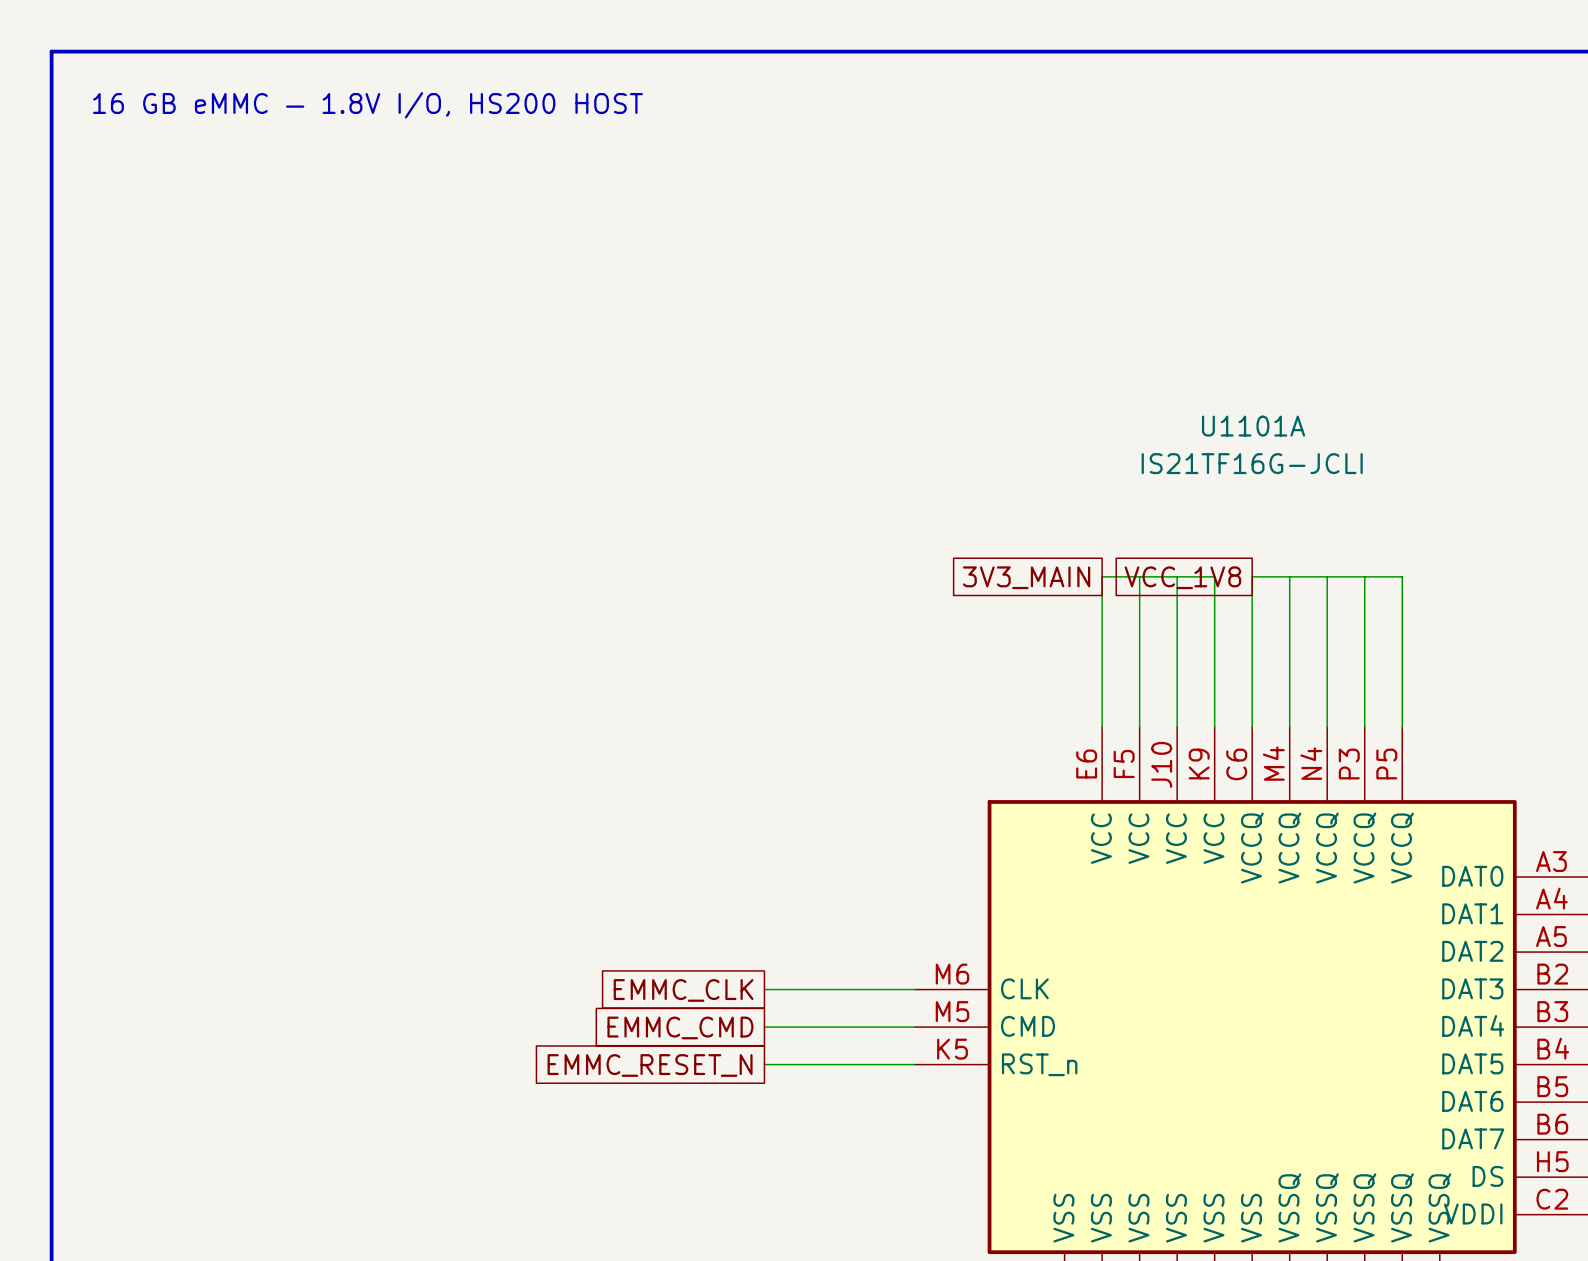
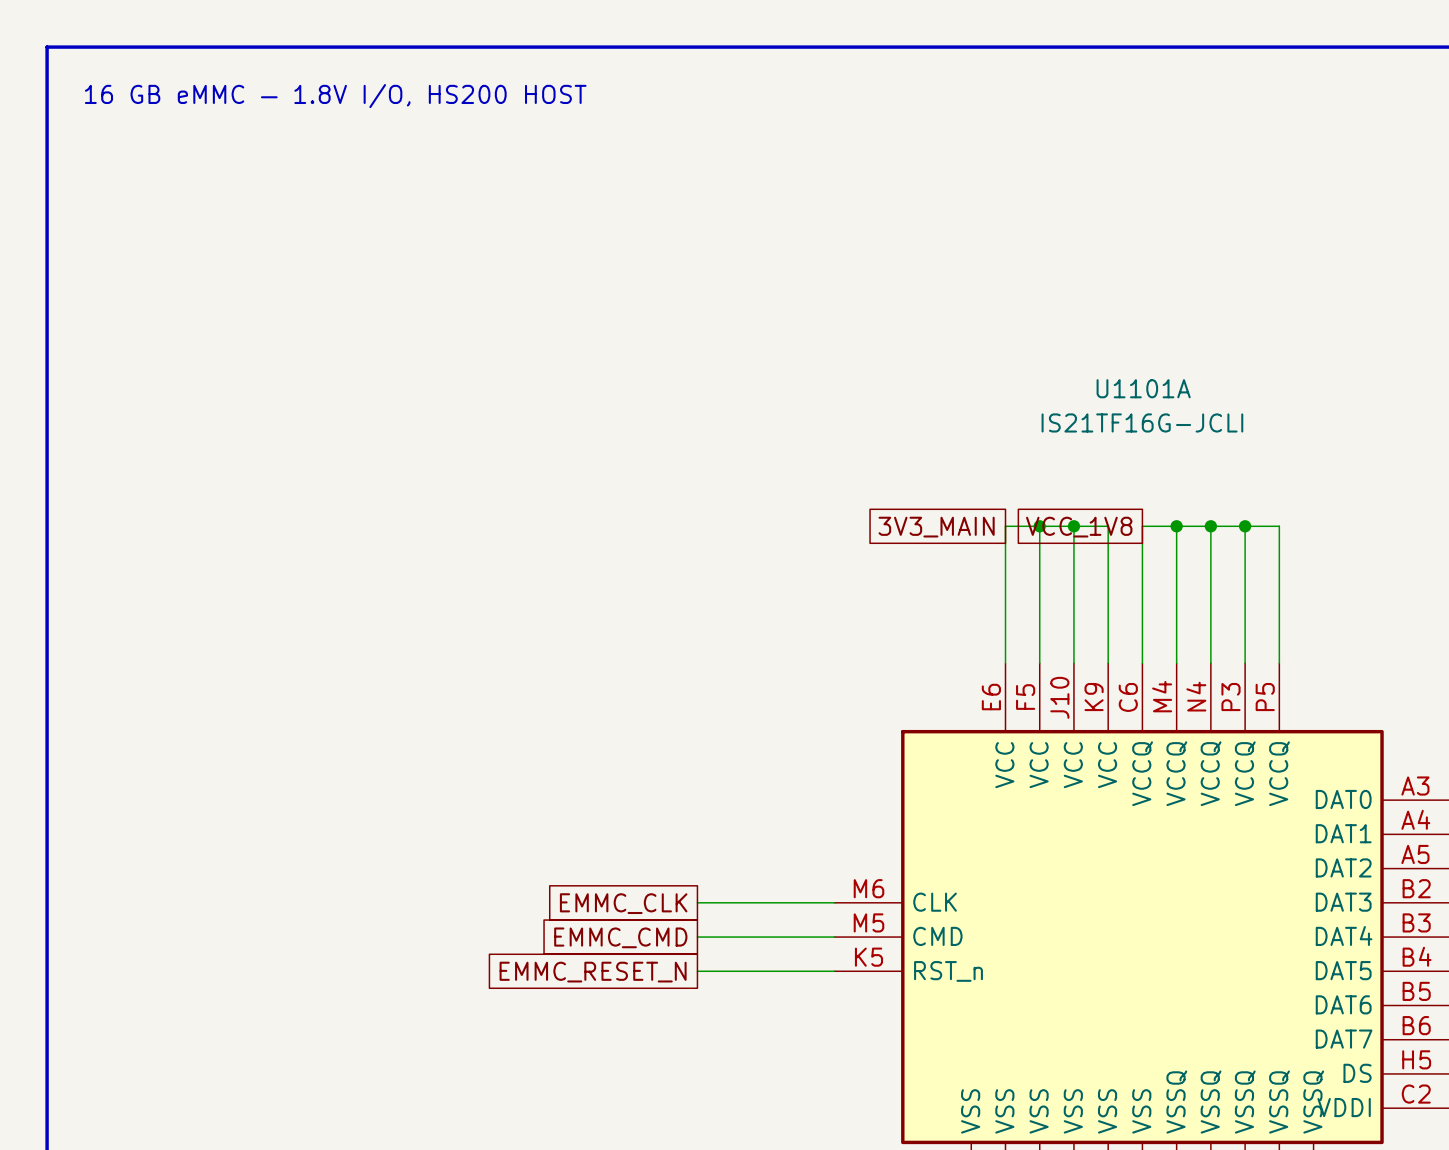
junction: none -> (1039, 526)
junction: none -> (1073, 526)
junction: none -> (1176, 526)
junction: none -> (1210, 526)
junction: none -> (1245, 526)

